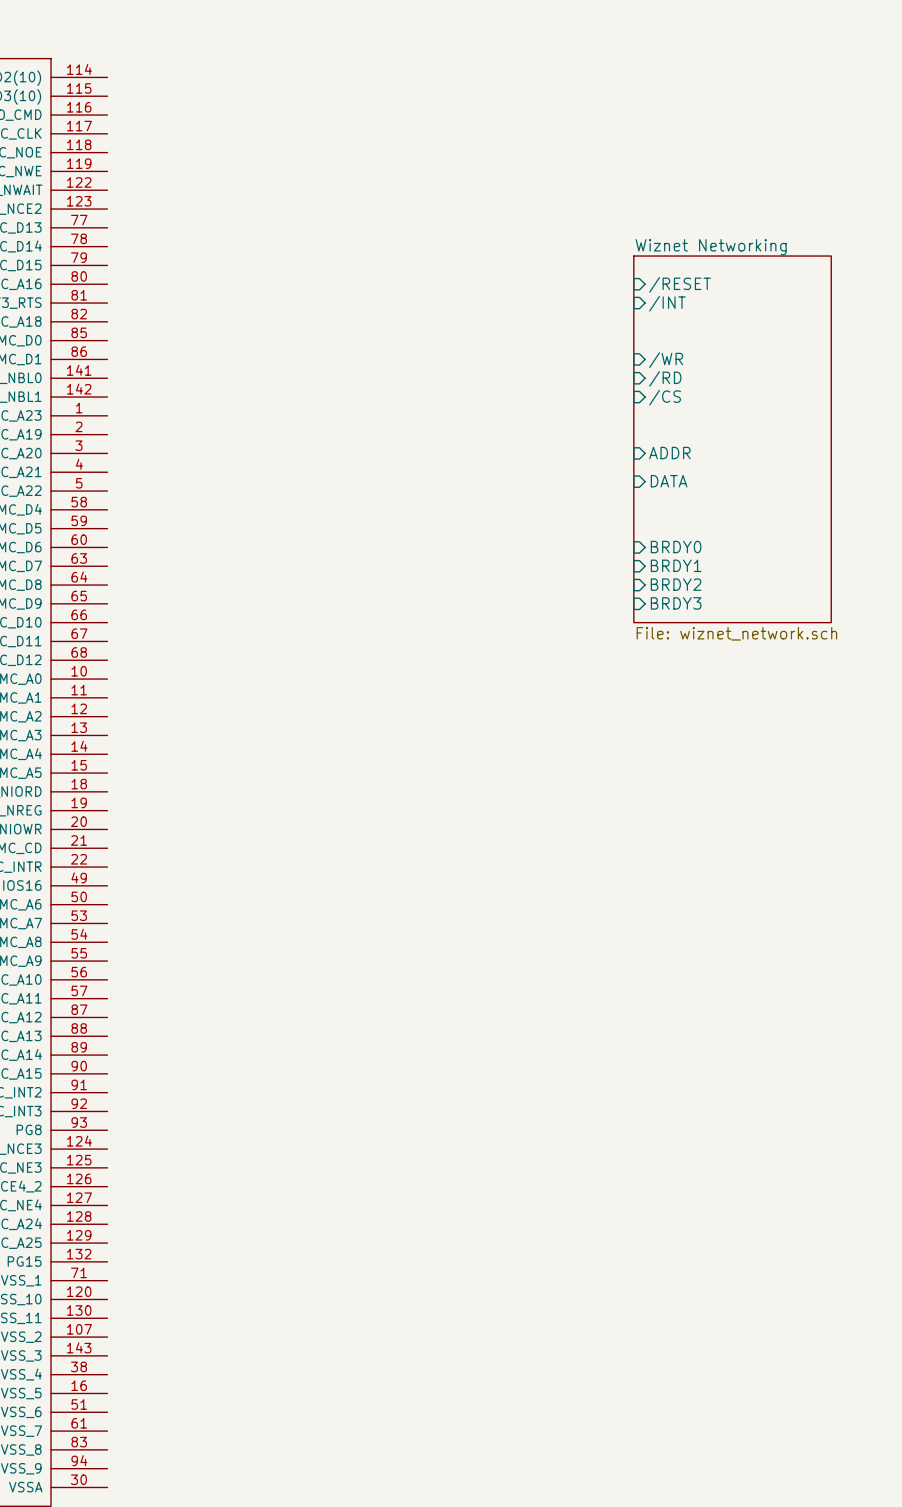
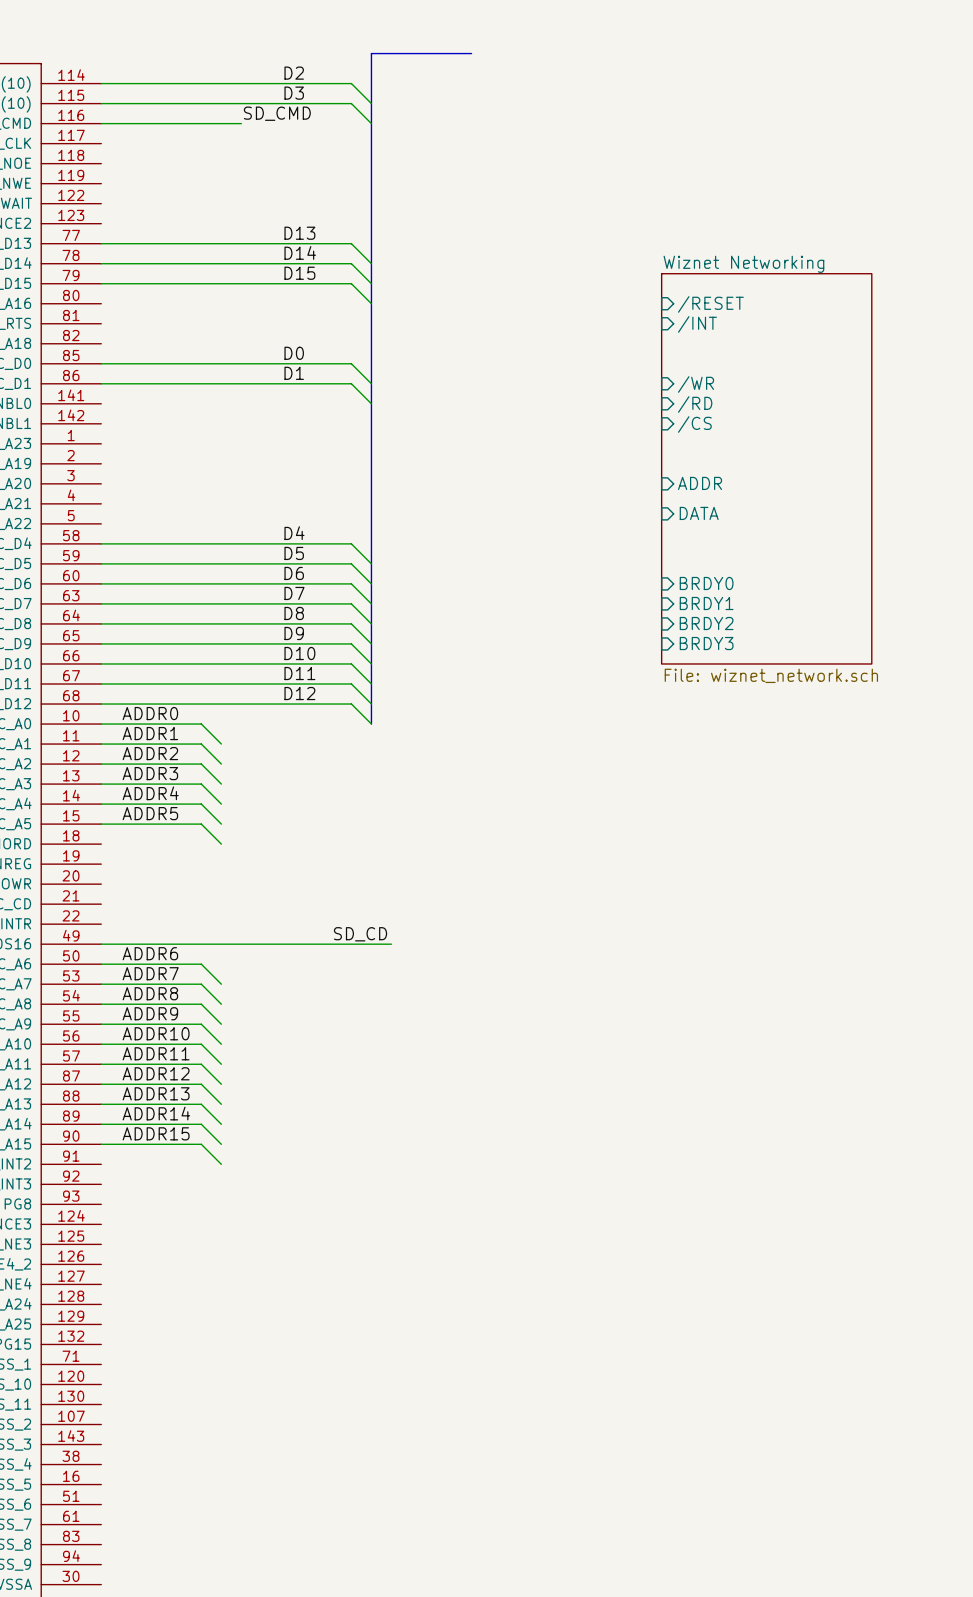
bus: none -> (471, 53) (371, 53) (371, 724)
label: none -> D2 (294, 73)
wire: none -> (101, 83) (351, 83) (371, 103)
label: none -> D3 (294, 93)
wire: none -> (101, 103) (351, 103) (371, 123)
label: none -> SD_CMD (277, 113)
wire: none -> (101, 123) (241, 123)
label: none -> D13 (299, 233)
wire: none -> (101, 243) (351, 243) (371, 263)
label: none -> D14 (300, 252)
wire: none -> (101, 263) (351, 263) (371, 283)
label: none -> D15 (299, 273)
wire: none -> (101, 283) (351, 283) (371, 303)
label: none -> D0 (294, 353)
wire: none -> (101, 363) (351, 363) (371, 383)
label: none -> D1 (294, 373)
wire: none -> (101, 383) (351, 383) (371, 403)
label: none -> D4 (294, 533)
wire: none -> (101, 543) (351, 543) (371, 563)
label: none -> D5 (294, 553)
wire: none -> (101, 563) (351, 563) (371, 583)
label: none -> D6 (294, 573)
wire: none -> (101, 583) (351, 583) (371, 603)
label: none -> D7 (294, 593)
wire: none -> (101, 603) (351, 603) (371, 623)
label: none -> D8 (294, 613)
wire: none -> (101, 623) (351, 623) (371, 643)
label: none -> D9 (294, 633)
wire: none -> (101, 643) (351, 643) (371, 663)
label: none -> D10 (299, 653)
wire: none -> (101, 663) (351, 663) (371, 684)
label: none -> D11 (299, 673)
wire: none -> (101, 684) (351, 684) (371, 704)
label: none -> D12 (299, 693)
wire: none -> (101, 704) (351, 704) (371, 724)
label: none -> ADDR0 (150, 713)
wire: none -> (101, 724) (201, 724) (221, 744)
label: none -> ADDR1 (150, 733)
wire: none -> (101, 744) (201, 744) (221, 764)
label: none -> ADDR2 (150, 753)
wire: none -> (101, 764) (201, 764) (221, 784)
label: none -> ADDR3 (150, 773)
wire: none -> (101, 784) (201, 784) (221, 804)
label: none -> ADDR4 (150, 793)
wire: none -> (101, 804) (201, 804) (221, 824)
label: none -> ADDR5 (150, 813)
wire: none -> (101, 824) (201, 824) (221, 844)
label: none -> SD_CD (360, 934)
wire: none -> (101, 944) (391, 944)
label: none -> ADDR6 (150, 953)
wire: none -> (101, 964) (201, 964) (221, 984)
label: none -> ADDR7 (150, 973)
wire: none -> (101, 984) (201, 984) (221, 1004)
label: none -> ADDR8 (150, 993)
wire: none -> (101, 1004) (201, 1004) (221, 1024)
label: none -> ADDR9 (150, 1013)
wire: none -> (101, 1024) (201, 1024) (221, 1044)
label: none -> ADDR10 (156, 1033)
wire: none -> (101, 1044) (201, 1044) (221, 1064)
label: none -> ADDR11 (156, 1053)
wire: none -> (101, 1064) (201, 1064) (221, 1084)
label: none -> ADDR12 (156, 1073)
wire: none -> (101, 1084) (201, 1084) (221, 1104)
label: none -> ADDR13 (156, 1093)
wire: none -> (101, 1104) (201, 1104) (221, 1124)
label: none -> ADDR14 (156, 1113)
wire: none -> (101, 1124) (201, 1124) (221, 1144)
label: none -> ADDR15 (156, 1133)
wire: none -> (101, 1144) (201, 1144) (221, 1164)

